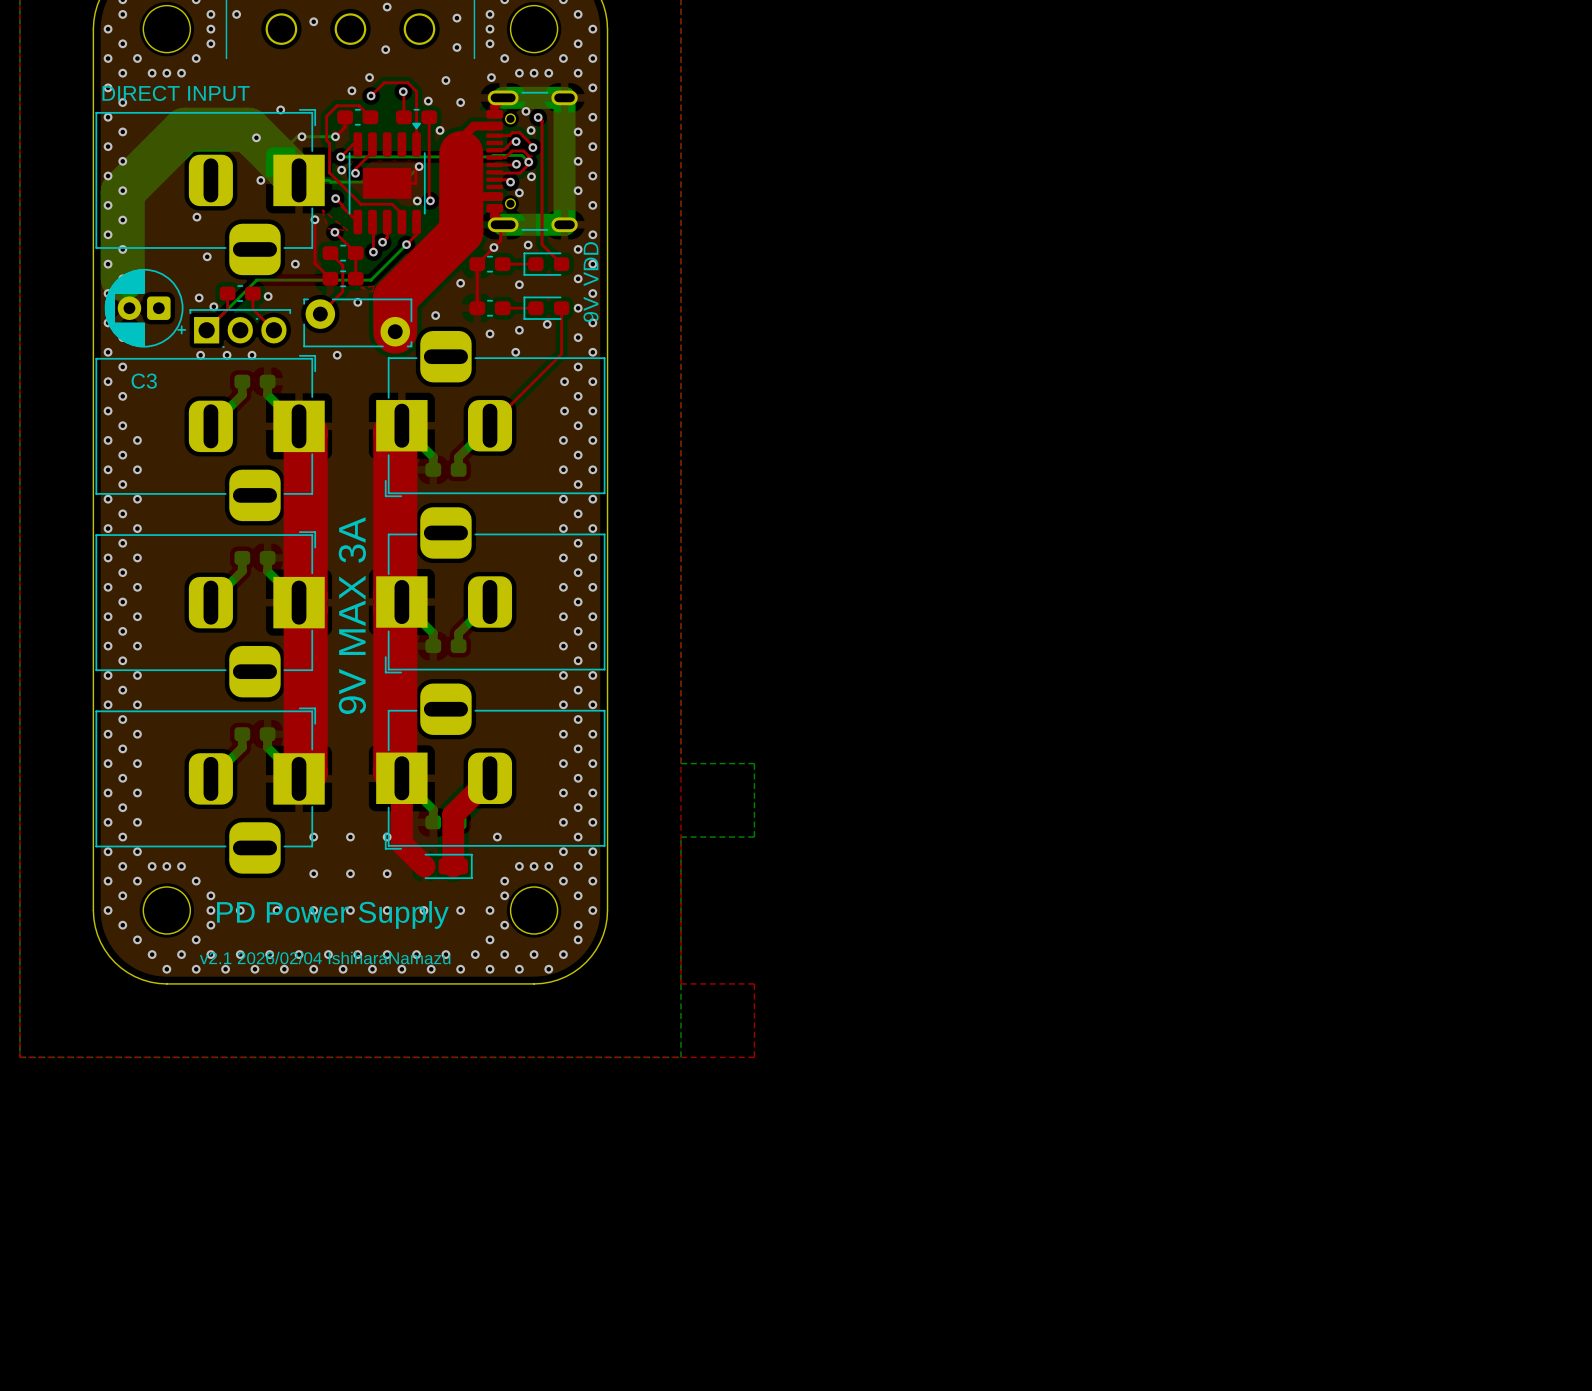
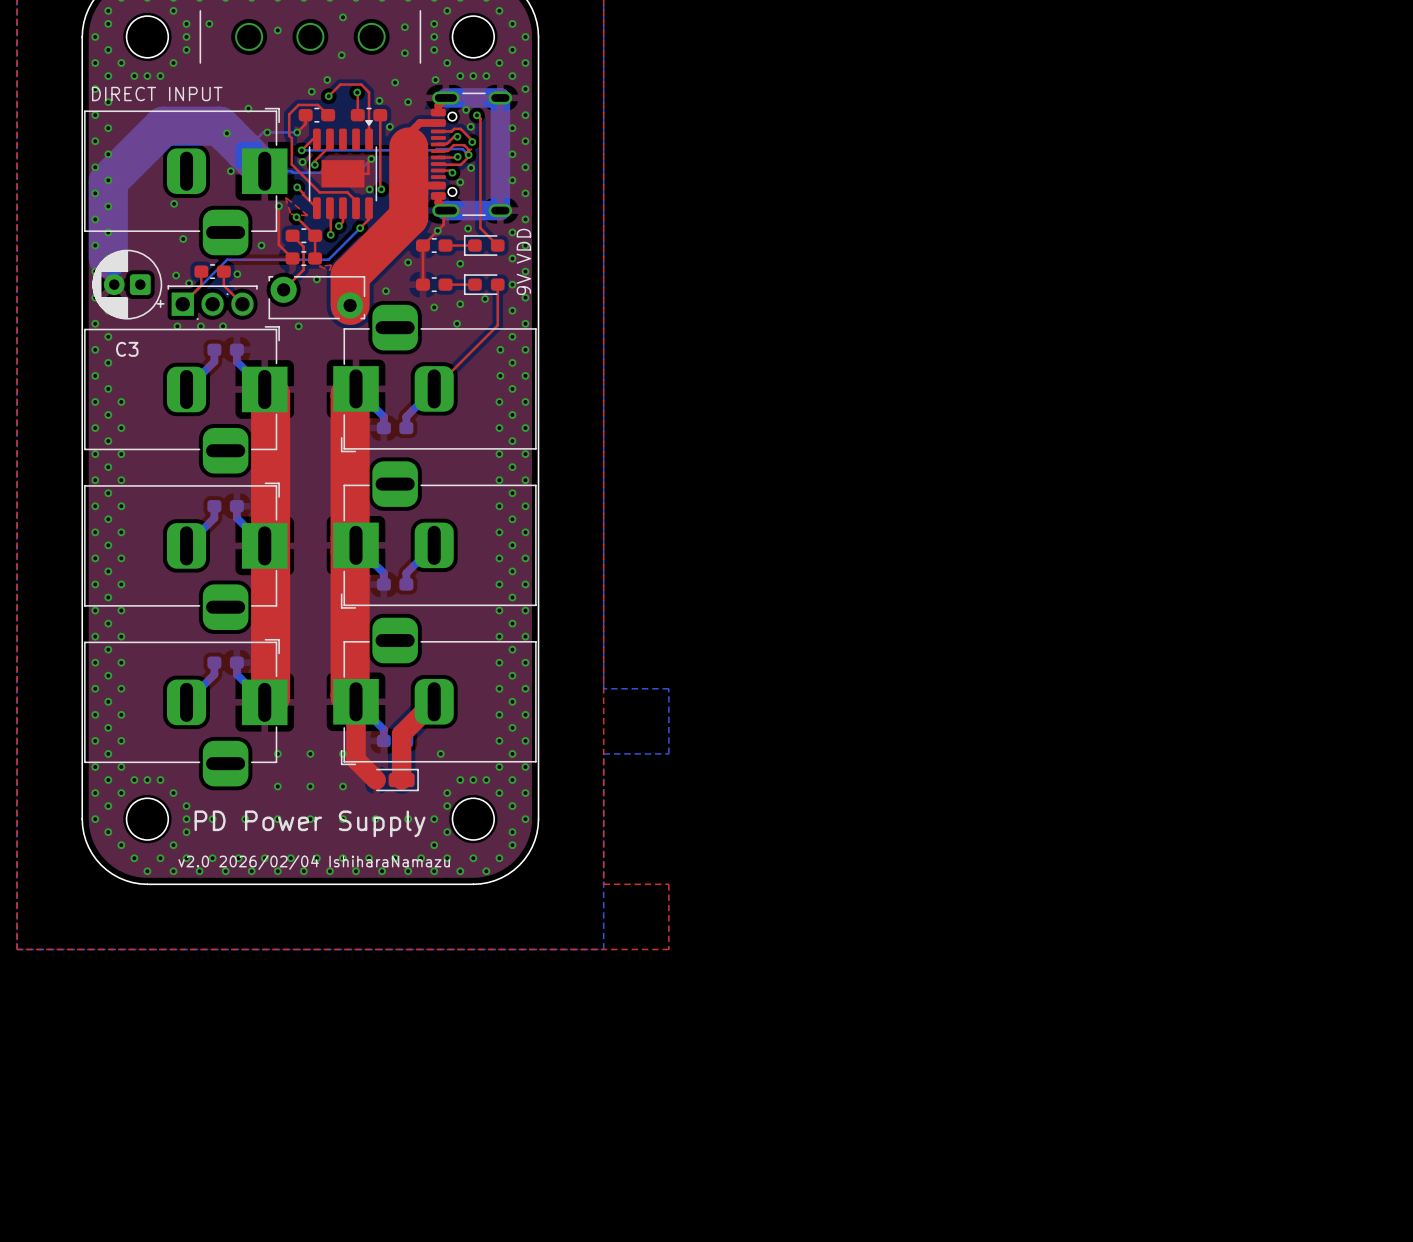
text: 9V MAX 3A (352, 615) -> none
text: v2.1 2026/02/04 IshiharaNamazu (325, 958) -> v2.0 2026/02/04 IshiharaNamazu (314, 862)

